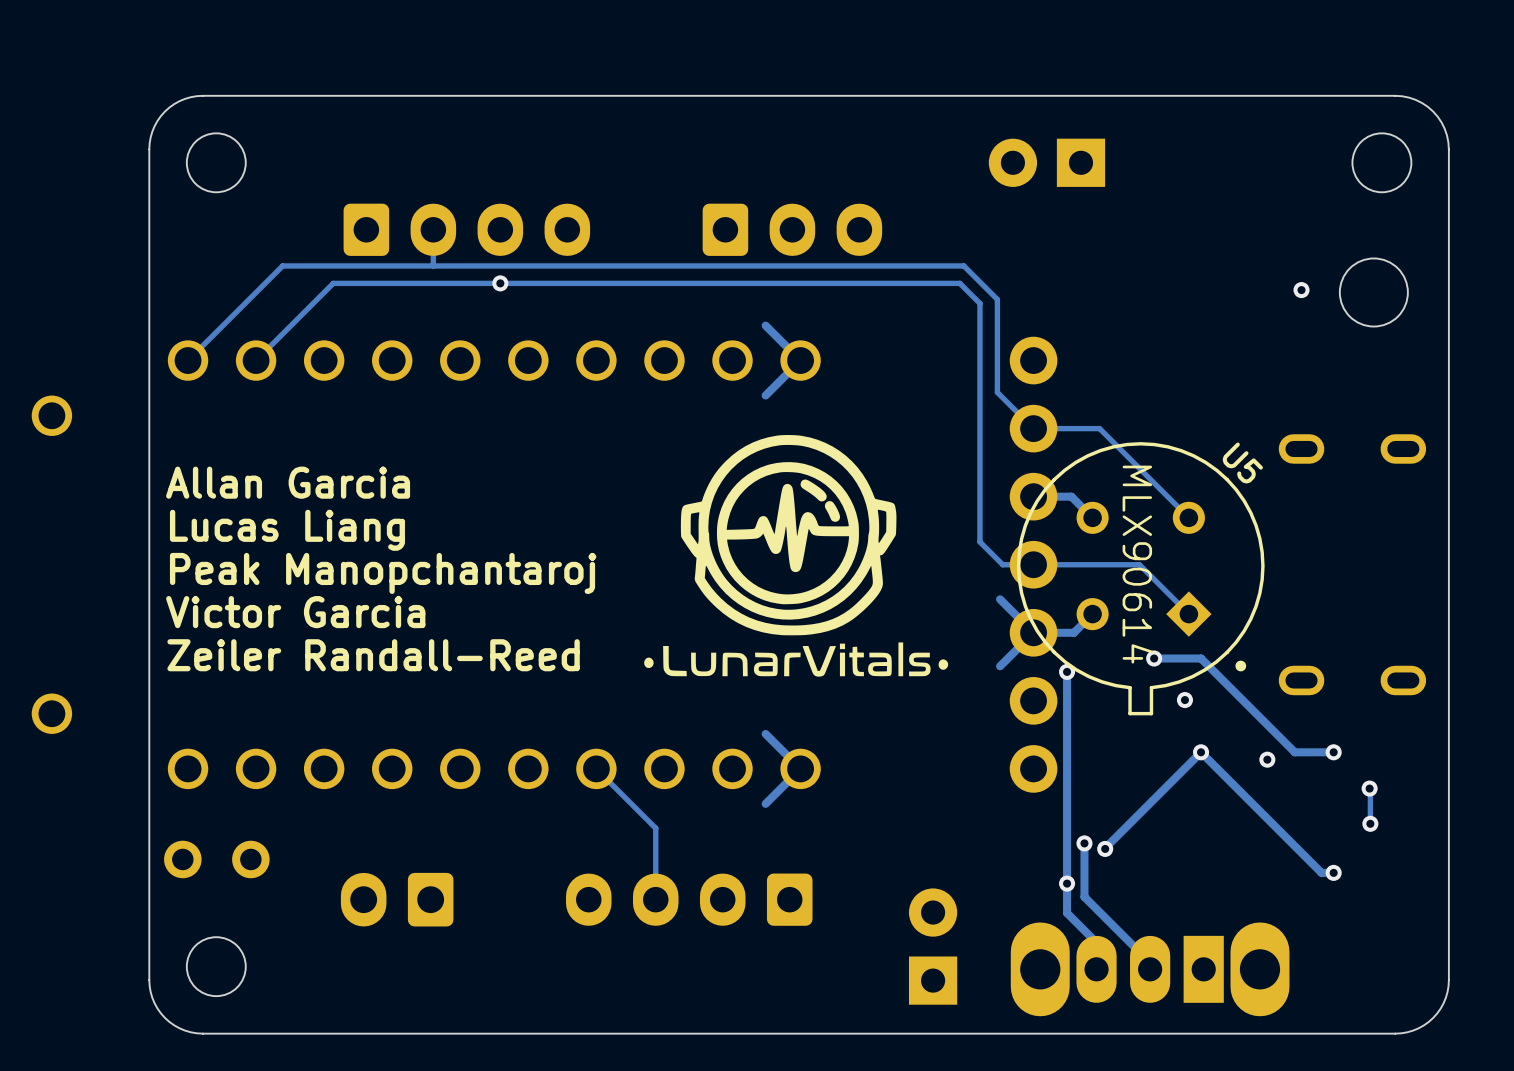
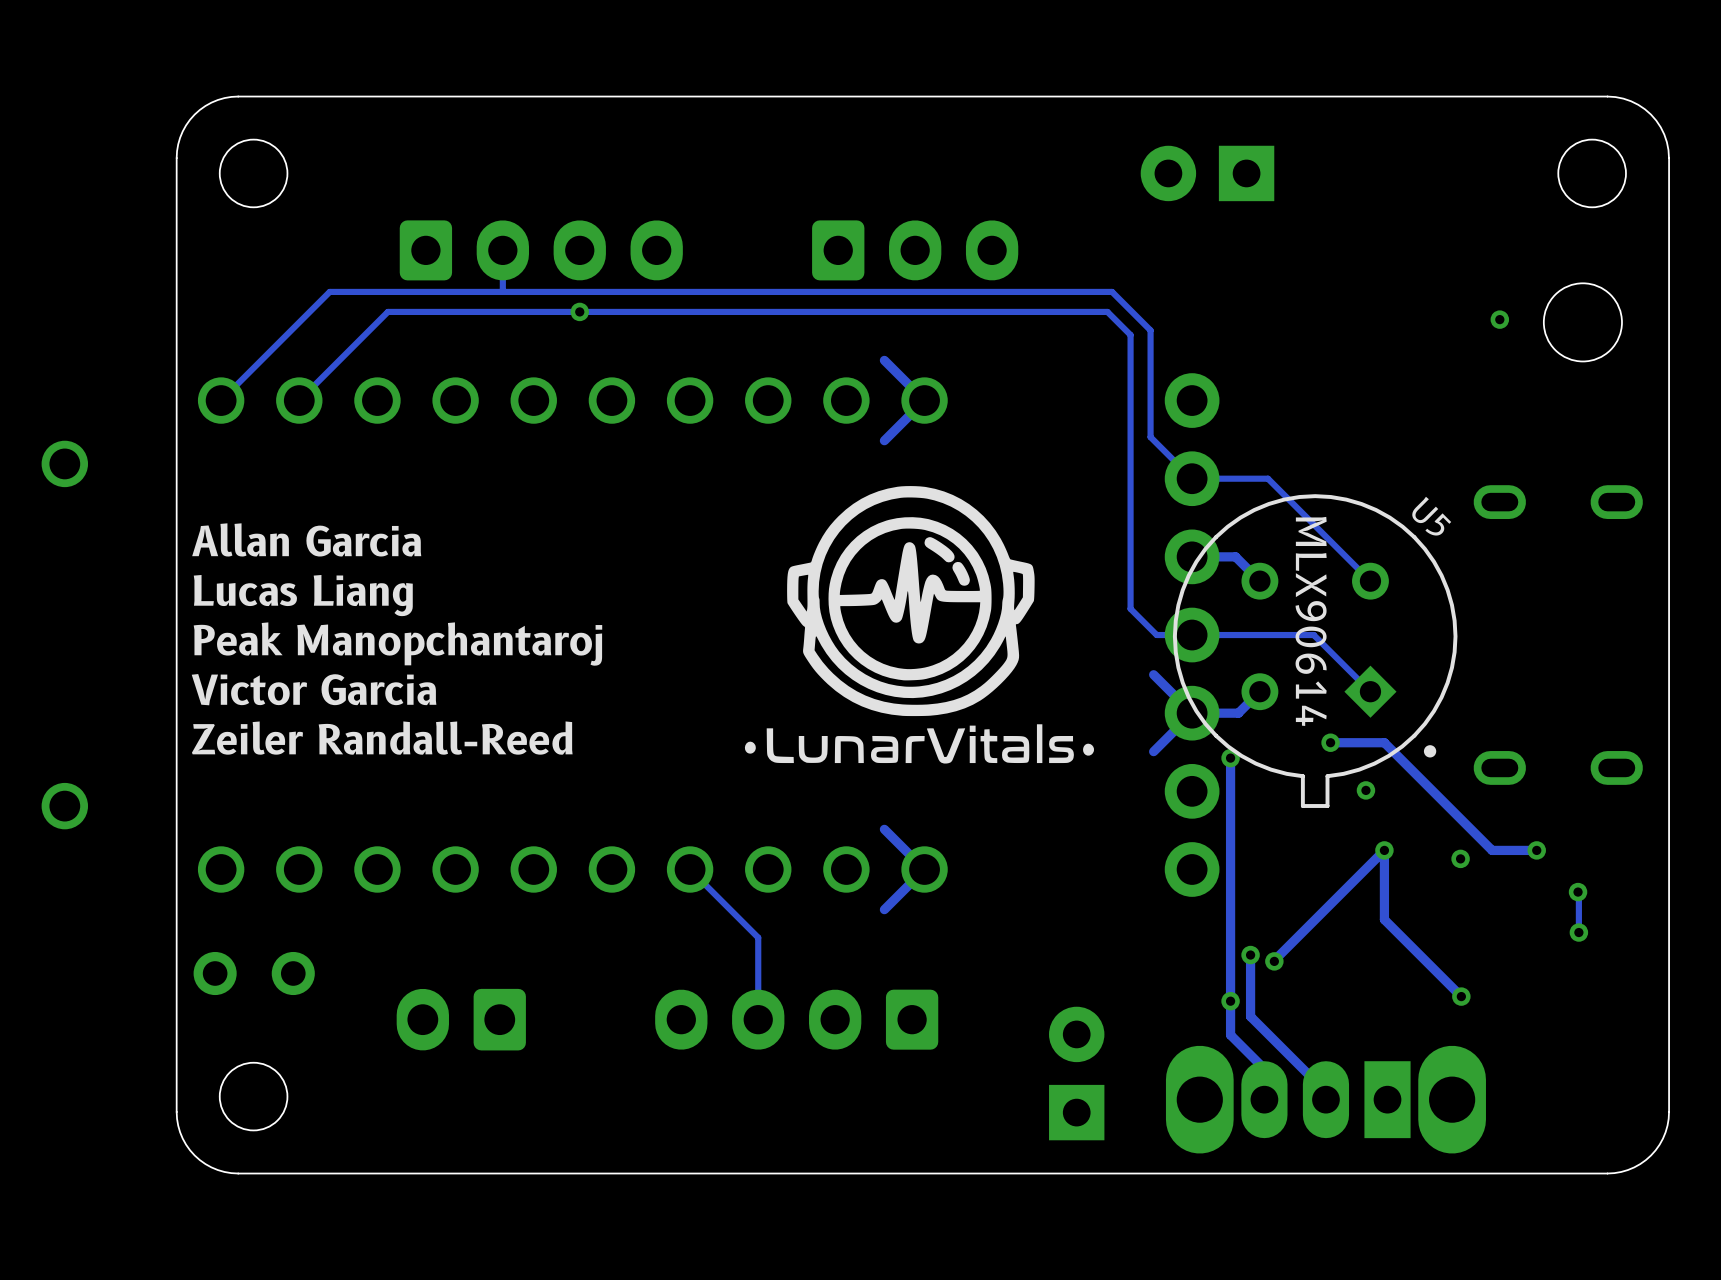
track: (1201, 752) (1321, 872) (1333, 872) -> (1384, 850) (1384, 919) (1461, 996)
via position: (1333, 872) -> (1461, 996)

